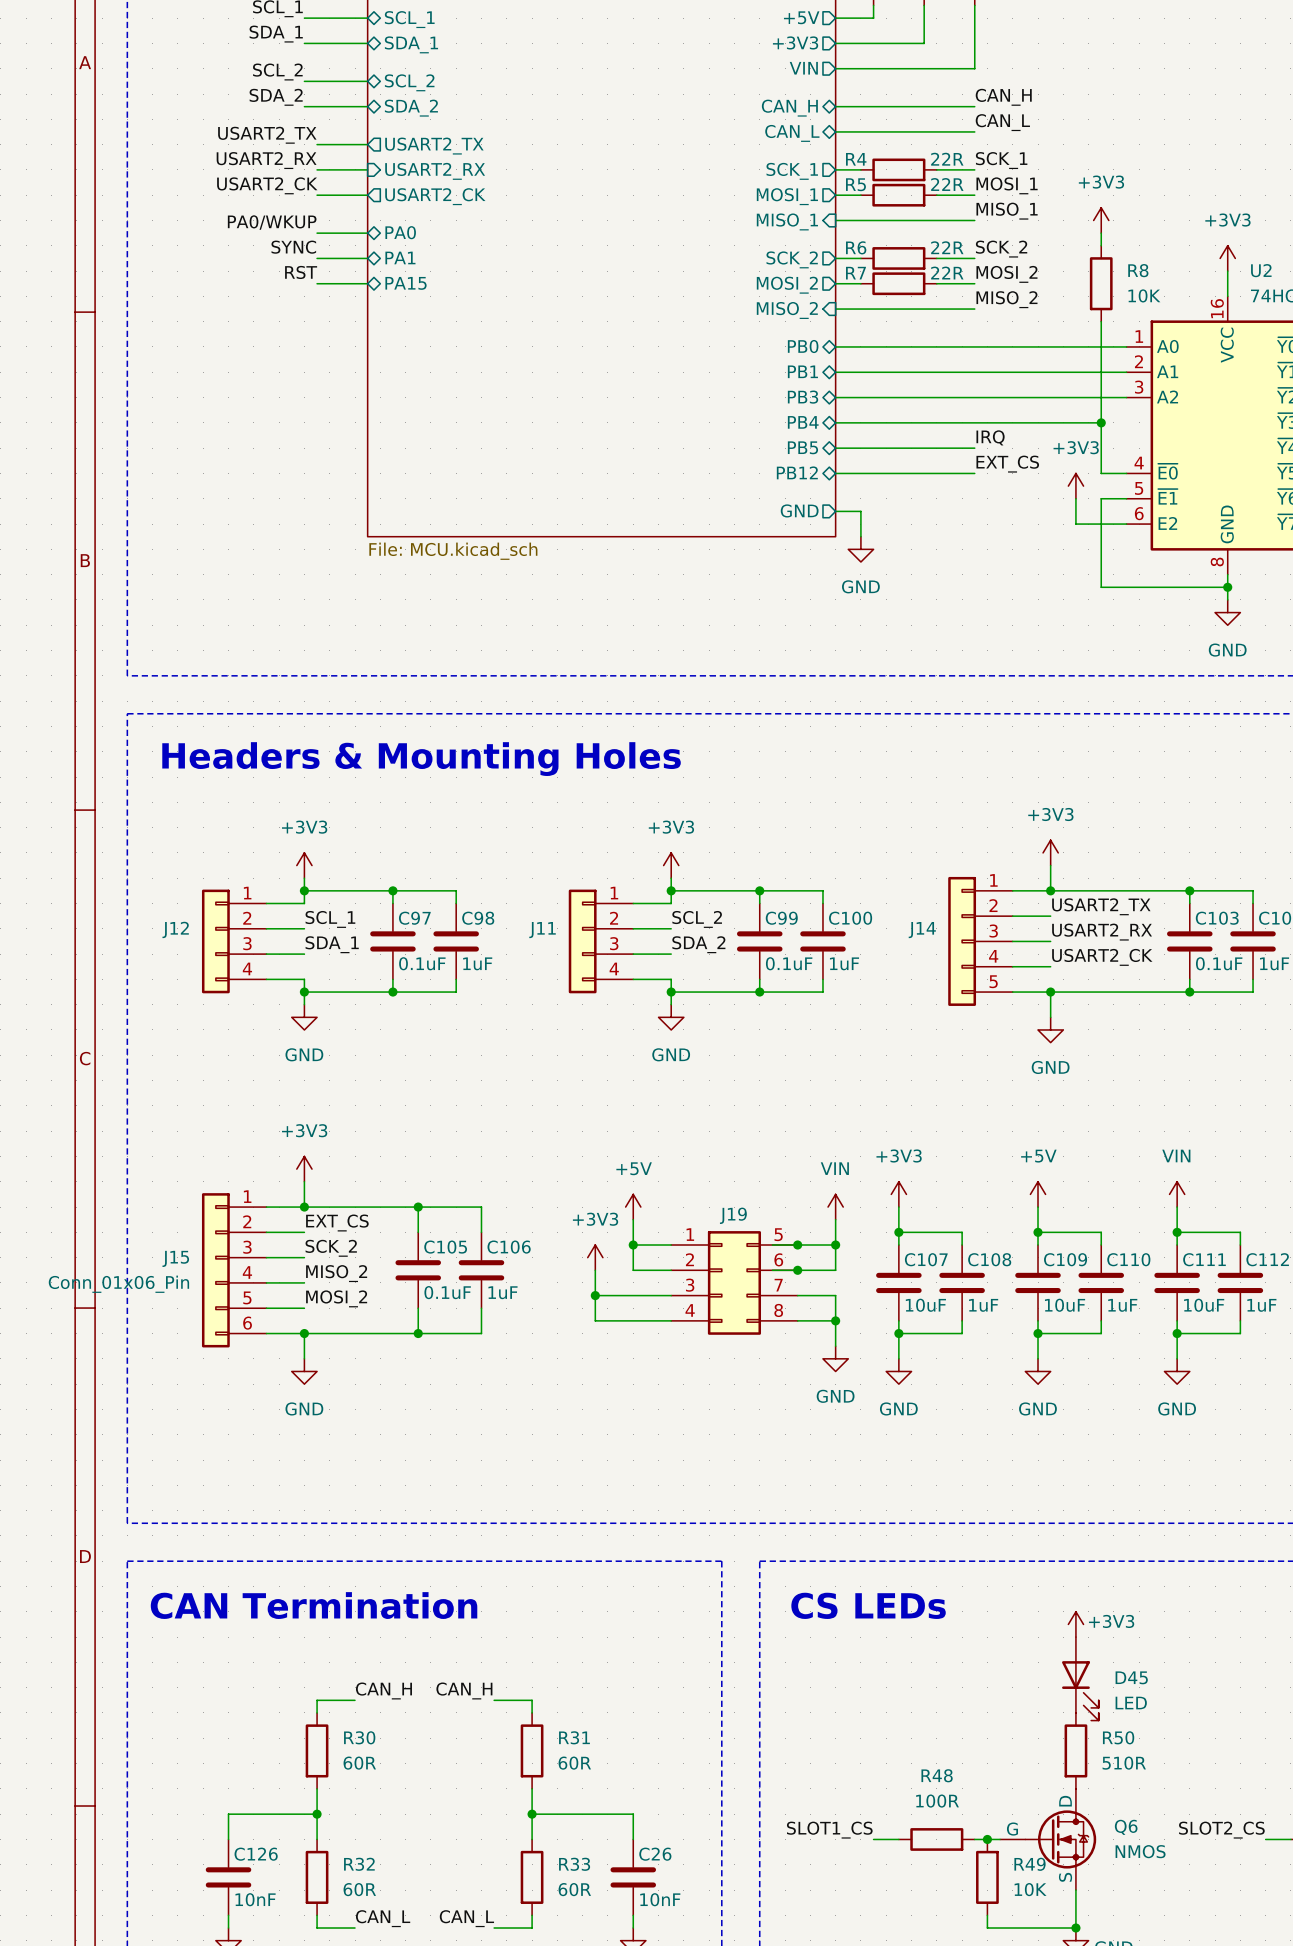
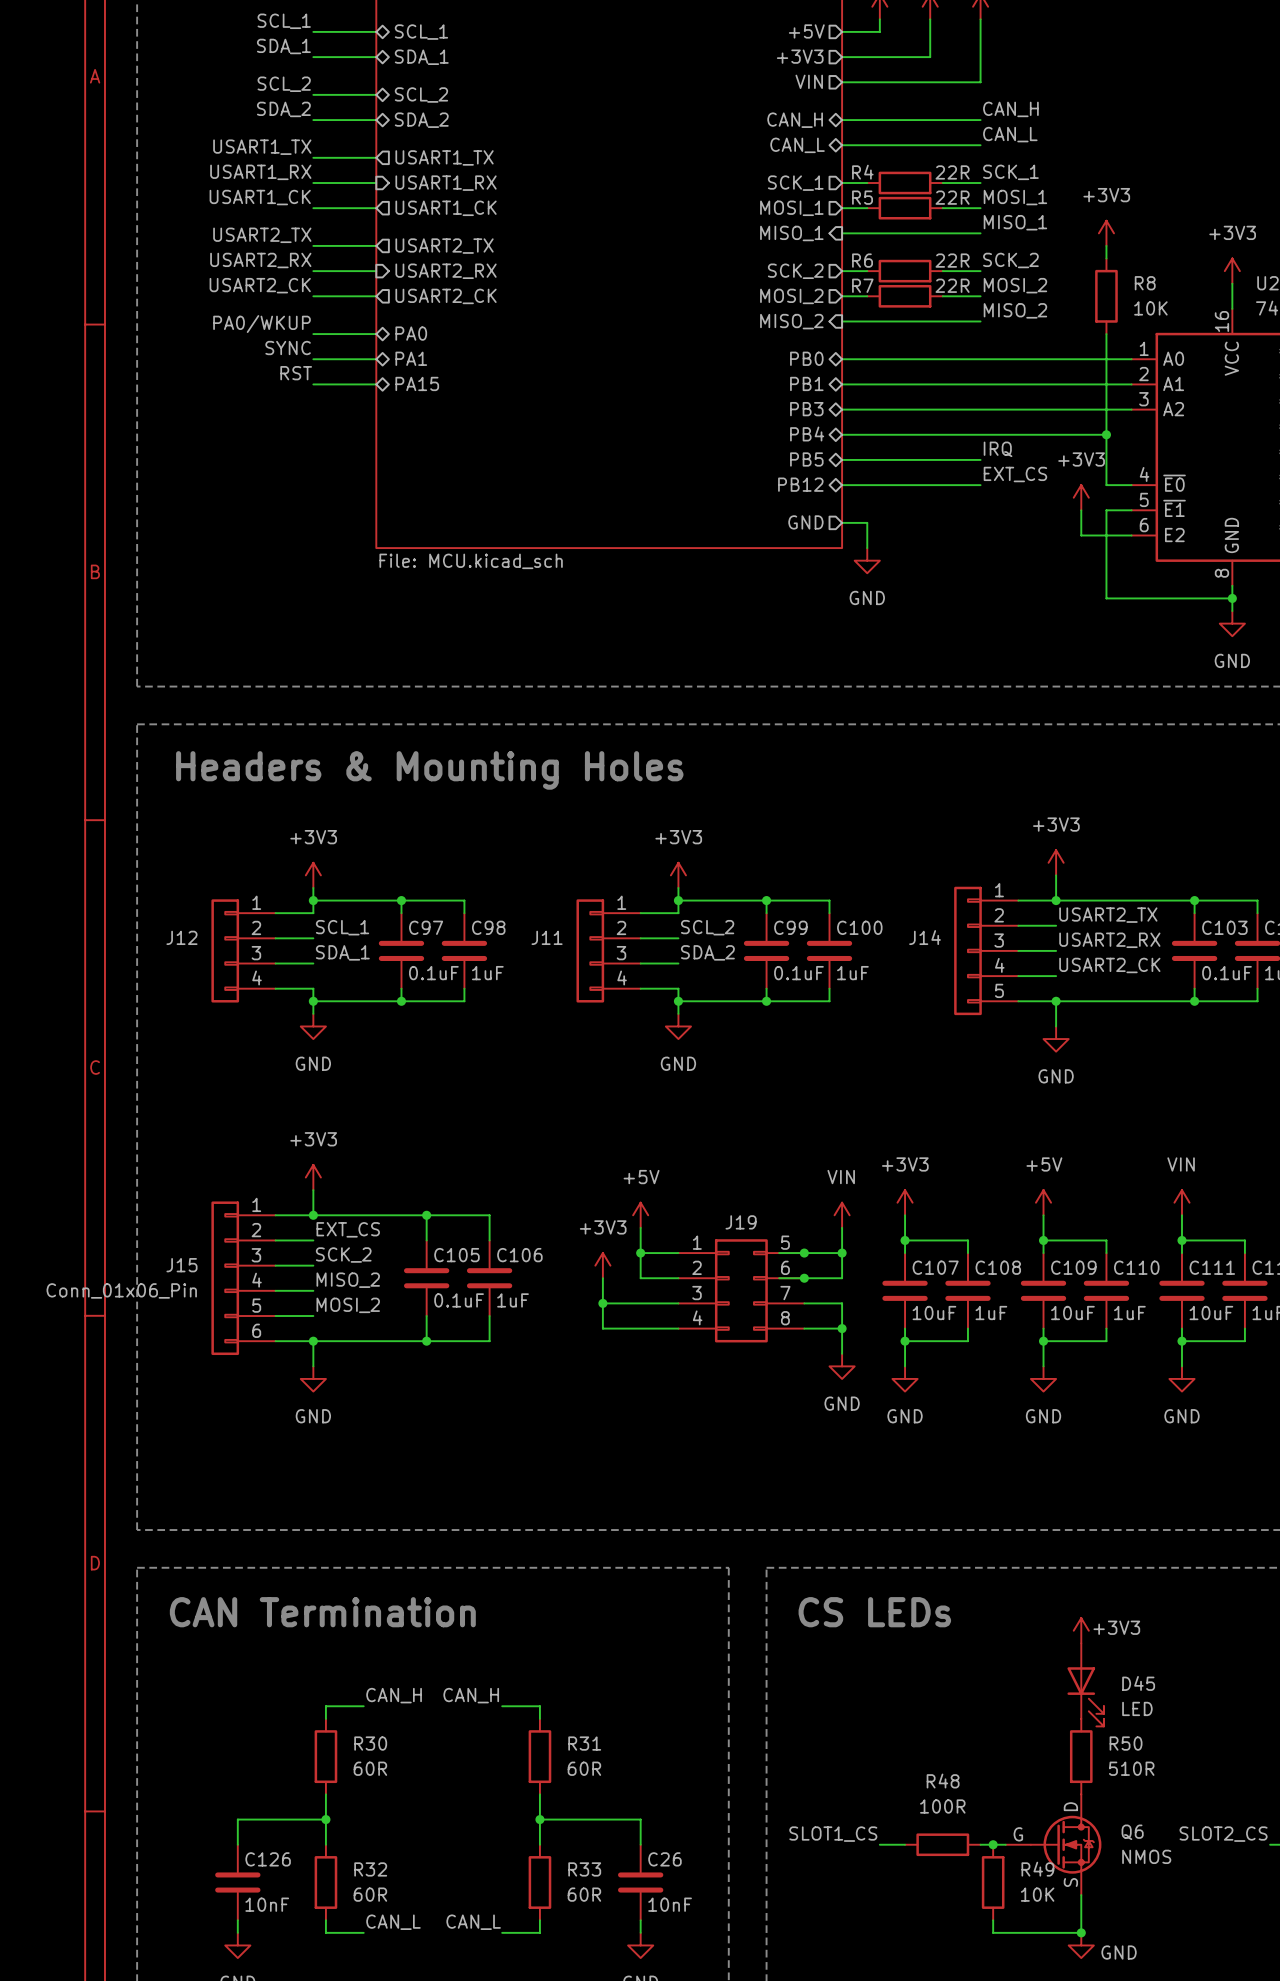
label: none -> USART1_TX (262, 147)
label position: USART2_TX (267, 135) -> USART2_TX (262, 235)
wire: none -> (313, 157) (325, 157)
sheet pin: USART2_TX (434, 146) -> USART1_TX (444, 157)
label: none -> USART1_RX (260, 172)
label position: USART2_RX (266, 160) -> USART2_RX (260, 260)
wire: none -> (313, 183) (325, 183)
sheet pin: USART2_RX (435, 171) -> USART1_RX (446, 183)
label: none -> USART1_CK (260, 197)
label position: USART2_CK (267, 185) -> USART2_CK (260, 285)
wire: none -> (313, 208) (325, 208)
sheet pin: USART2_CK (435, 196) -> USART1_CK (446, 208)
label position: PA0/WKUP (272, 222) -> PA0/WKUP (262, 324)
sheet pin shape: bidirectional (400, 232) -> output (444, 246)
sheet pin: PA0 (400, 232) -> USART2_TX (444, 246)
wire: none -> (313, 245) (325, 245)
label position: SYNC (293, 247) -> SYNC (288, 348)
sheet pin shape: bidirectional (400, 257) -> input (446, 271)
sheet pin: PA1 (400, 257) -> USART2_RX (446, 271)
wire: none -> (313, 271) (325, 271)
label position: RST (301, 272) -> RST (296, 373)
wire: none -> (313, 296) (325, 296)
sheet pin shape: bidirectional (406, 283) -> output (446, 296)
sheet pin: PA15 (406, 283) -> USART2_CK (446, 296)
wire: none -> (313, 334) (376, 334)
sheet pin: none -> PA0 (411, 333)
wire: none -> (313, 359) (376, 359)
sheet pin: none -> PA1 (411, 358)
sheet pin: none -> PA15 (417, 383)
wire: none -> (313, 384) (376, 384)

